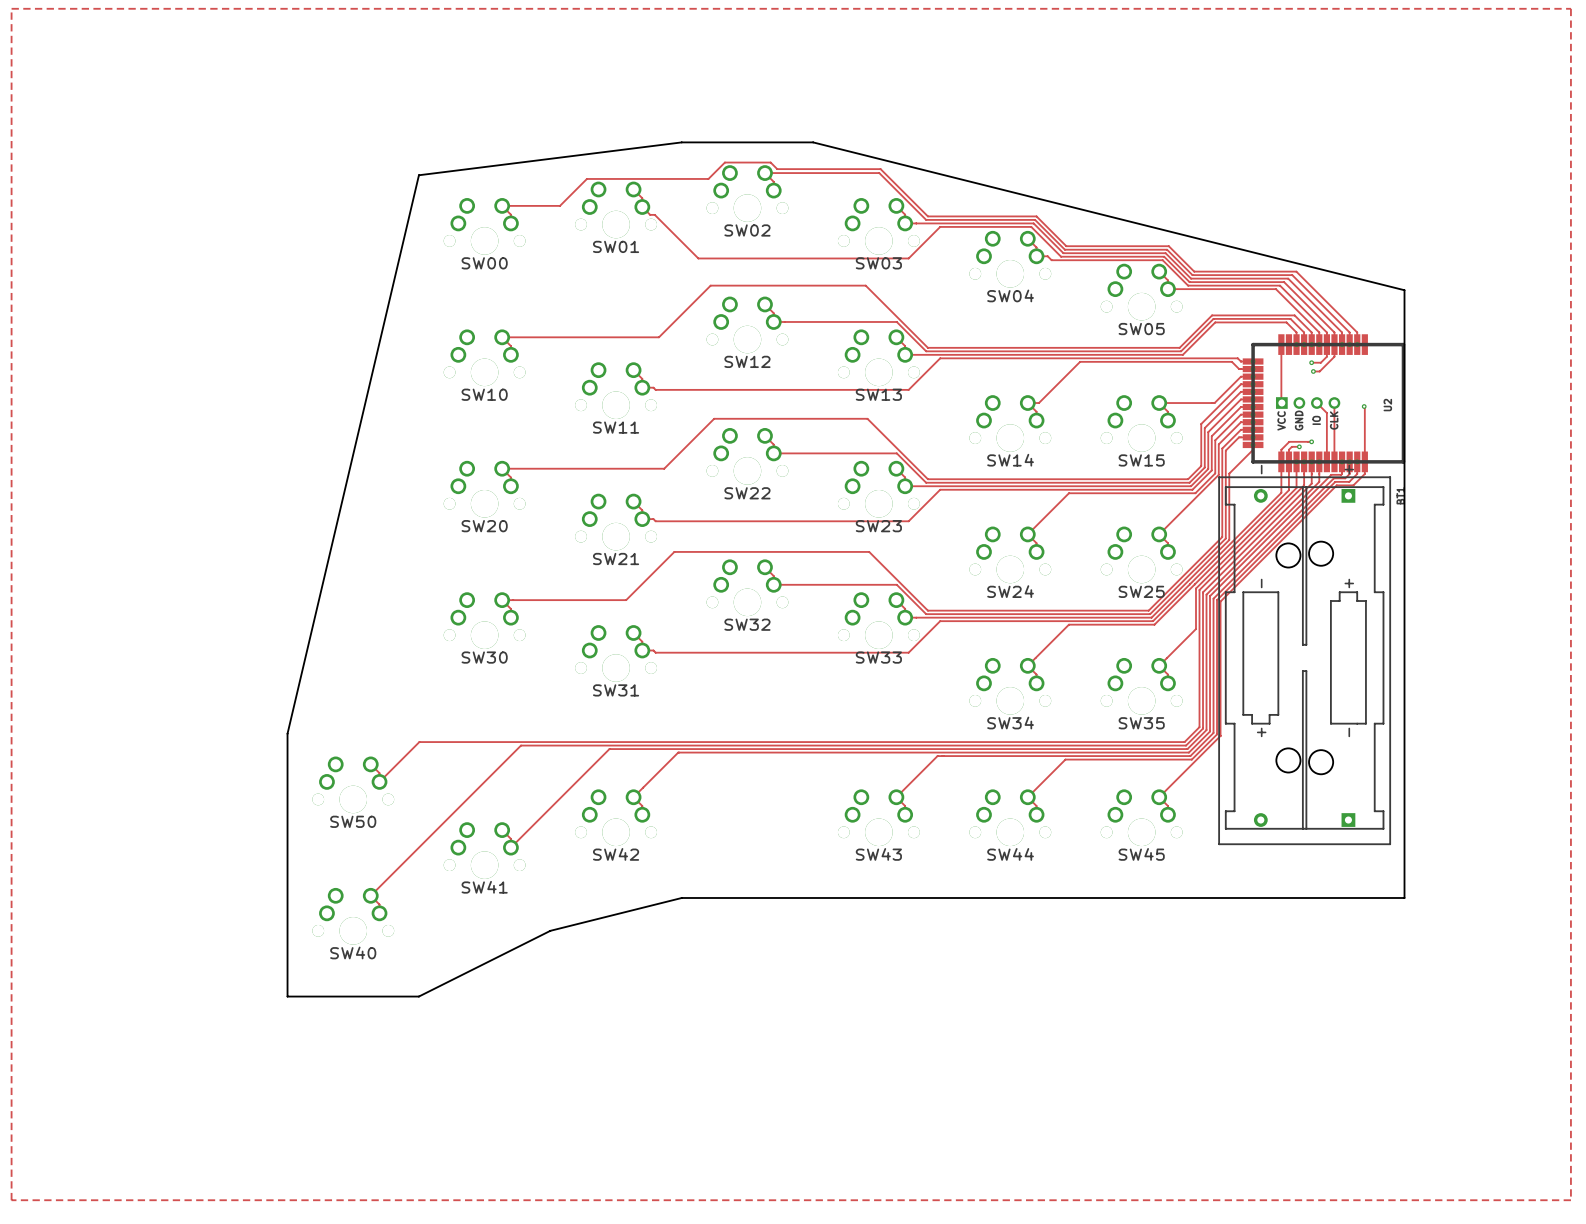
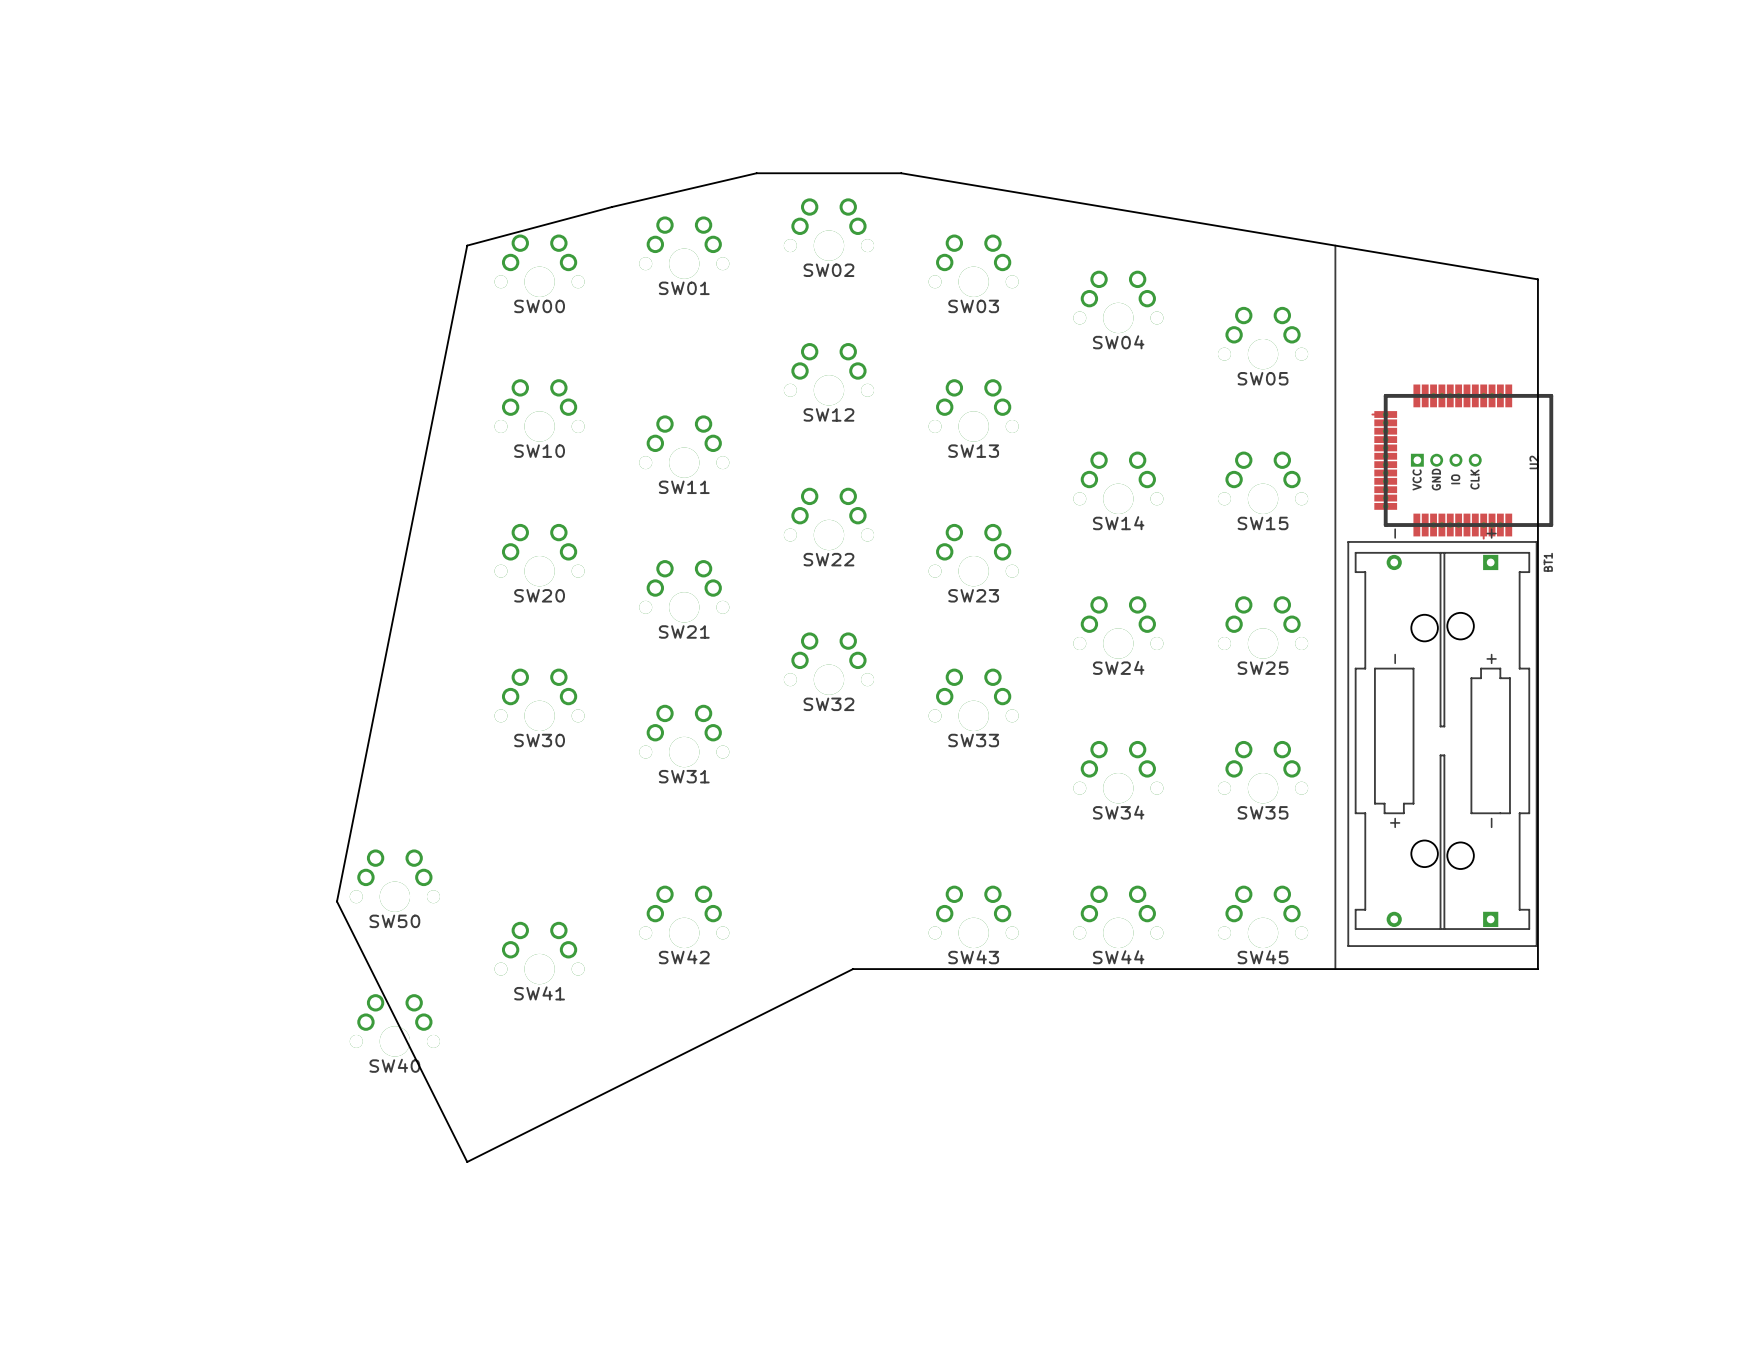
zone outline: (11, 8) (1570, 8) (1570, 1200) (11, 1200) (11, 8) -> none
board edge: (681, 142) (418, 175) (287, 733) (287, 996) (418, 996) (550, 930) (681, 897) (1404, 897) (1404, 290) (813, 142) -> (756, 173) (611, 207) (467, 245) (337, 901) (467, 1161) (853, 969) (1537, 969) (1537, 279) (901, 173)
track: (633, 189) (642, 198) (642, 207) (650, 214) (654, 214) (698, 258) (908, 258) (940, 226) (1031, 226) (1061, 256) (1164, 256) (1189, 282) (1284, 282) (1334, 332) (1334, 356) (1319, 371) (1313, 371) -> none
track: (773, 190) (773, 181) (764, 173) (879, 173) (926, 219) (1035, 219) (1064, 249) (1167, 249) (1192, 275) (1292, 275) (1349, 332) (1349, 344) -> none
track: (896, 205) (905, 214) (905, 223) (1033, 223) (1063, 253) (1165, 253) (1191, 278) (1288, 278) (1342, 332) (1342, 344) -> none
line: none -> (1335, 245) (1335, 969)
track: (510, 223) (510, 214) (502, 205) (559, 205) (586, 178) (708, 178) (724, 162) (770, 162) (777, 169) (880, 169) (927, 216) (1036, 216) (1066, 246) (1168, 246) (1194, 271) (1296, 271) (1357, 332) (1357, 344) -> none
track: (1027, 238) (1036, 247) (1036, 256) (1047, 256) (1051, 260) (1162, 260) (1188, 285) (1280, 285) (1326, 332) (1326, 356) (1320, 362) (1311, 362) -> none
track: (1159, 271) (1167, 280) (1167, 289) (1275, 289) (1319, 332) (1319, 344) -> none
track: (764, 304) (773, 313) (773, 321) (896, 321) (926, 351) (1181, 351) (1213, 318) (1290, 318) (1304, 332) (1304, 344) -> none
track: (896, 337) (905, 346) (905, 354) (1182, 354) (1215, 322) (1286, 322) (1296, 332) (1296, 344) -> none
track: (1281, 344) (1281, 403) -> none
track: (1311, 344) (1311, 332) (1294, 315) (1212, 315) (1179, 347) (927, 347) (865, 285) (710, 285) (658, 337) (502, 337) (510, 346) (510, 354) -> none
track: (1240, 361) (1237, 358) (940, 358) (908, 389) (655, 389) (653, 387) (642, 387) (642, 378) (633, 370) -> none
via: (1311, 362) -> none
track: (1253, 369) (1239, 369) (1231, 361) (1080, 361) (1038, 403) (1027, 403) (1036, 411) (1036, 420) -> none
via: (1313, 371) -> none
track: (1253, 376) (1240, 376) (1214, 403) (1159, 403) (1167, 411) (1167, 420) -> none
track: (1253, 384) (1240, 384) (1201, 423) (1201, 466) (1188, 479) (927, 479) (867, 418) (714, 418) (664, 468) (502, 468) (510, 477) (510, 486) -> none
track: (1253, 391) (1240, 391) (1204, 428) (1204, 467) (1189, 482) (926, 482) (896, 453) (773, 453) (773, 444) (764, 435) -> none
track: (1253, 399) (1240, 399) (1208, 432) (1208, 469) (1191, 486) (905, 486) (905, 477) (896, 468) -> none
track: (1316, 403) (1326, 413) (1326, 461) -> none
track: (1334, 403) (1334, 461) -> none
track: (1364, 406) (1364, 473) (1353, 485) (1336, 485) (1220, 601) (1220, 735) (1159, 797) (1167, 806) (1167, 814) -> none
via: (1364, 406) -> none
track: (1253, 407) (1240, 407) (1211, 436) (1211, 470) (1192, 489) (940, 489) (908, 521) (655, 521) (653, 519) (642, 519) (642, 510) (633, 501) -> none
track: (1253, 414) (1240, 414) (1215, 440) (1215, 473) (1195, 493) (1068, 493) (1027, 534) (1036, 543) (1036, 551) -> none
track: (1253, 422) (1240, 422) (1218, 444) (1218, 474) (1159, 534) (1167, 543) (1167, 551) -> none
track: (1253, 429) (1240, 429) (1222, 448) (1222, 537) (1148, 610) (927, 610) (869, 551) (674, 551) (626, 600) (502, 600) (510, 608) (510, 617) -> none
track: (1253, 437) (1239, 437) (1225, 450) (1225, 538) (1150, 614) (926, 614) (896, 584) (773, 584) (773, 576) (764, 567) -> none
track: (1311, 441) (1289, 441) (1281, 449) (1281, 492) (1153, 621) (940, 621) (908, 652) (655, 652) (653, 650) (642, 650) (642, 641) (633, 632) -> none
via: (1311, 441) -> none
track: (1253, 444) (1253, 449) (1229, 473) (1229, 539) (1151, 617) (905, 617) (905, 608) (896, 600) -> none
track: (1299, 446) (1291, 446) (1288, 449) (1288, 490) (1154, 624) (1068, 624) (1027, 665) (1036, 674) (1036, 683) -> none
via: (1299, 446) -> none
track: (1296, 461) (1296, 488) (1196, 588) (1196, 629) (1159, 665) (1167, 674) (1167, 683) -> none
track: (1304, 461) (1304, 485) (1199, 590) (1199, 727) (1184, 742) (419, 742) (379, 781) (379, 773) (370, 764) -> none
track: (1311, 461) (1311, 483) (1203, 592) (1203, 728) (1186, 745) (521, 745) (370, 895) (379, 904) (379, 913) -> none
track: (1319, 461) (1319, 481) (1206, 594) (1206, 730) (1187, 749) (609, 749) (510, 847) (510, 838) (502, 830) -> none
track: (1349, 461) (1349, 473) (1345, 478) (1333, 478) (1213, 598) (1213, 732) (1190, 756) (937, 756) (896, 797) (905, 806) (905, 814) -> none
track: (1357, 461) (1357, 473) (1349, 481) (1335, 481) (1217, 600) (1217, 734) (1191, 759) (1065, 759) (1027, 797) (1036, 806) (1036, 814) -> none
track: (1342, 473) (1331, 474) (1210, 596) (1210, 731) (1188, 752) (678, 752) (633, 797) (642, 806) (642, 814) -> none

